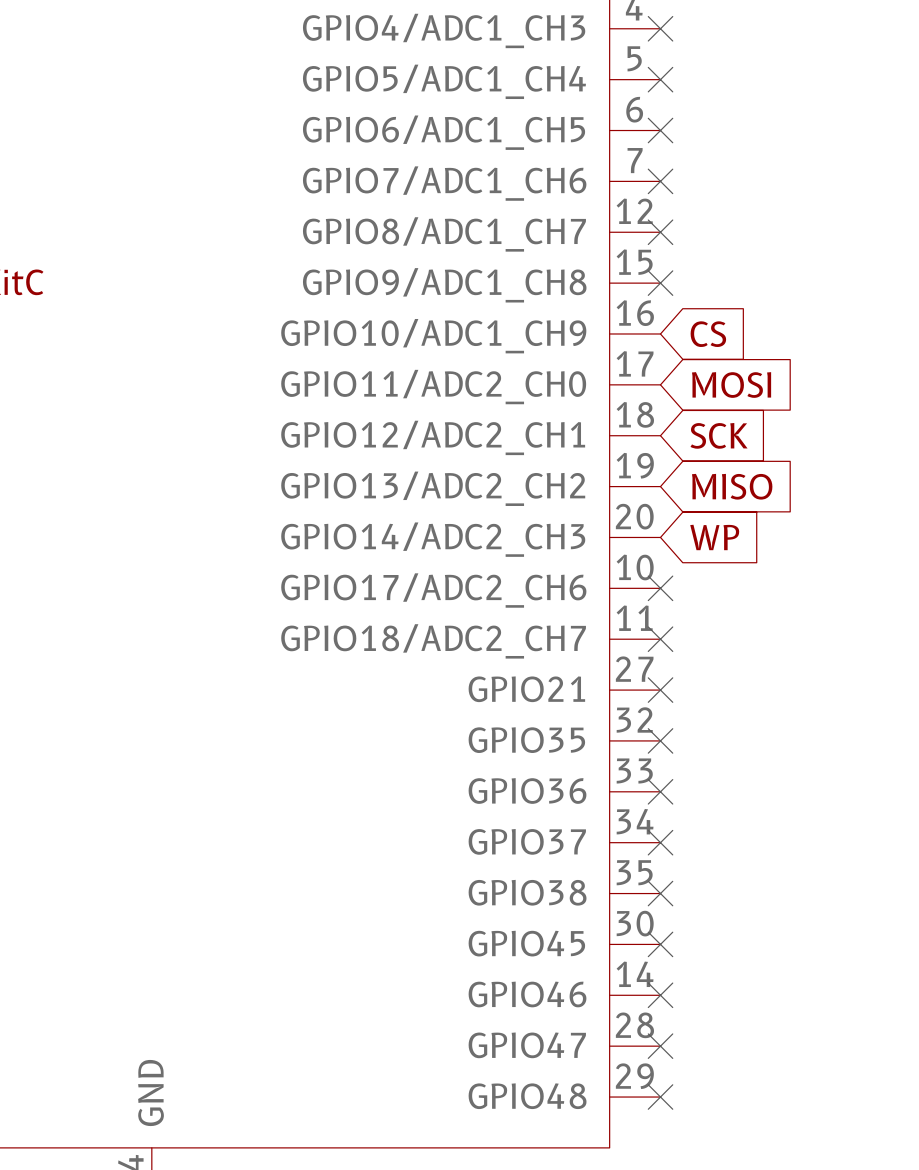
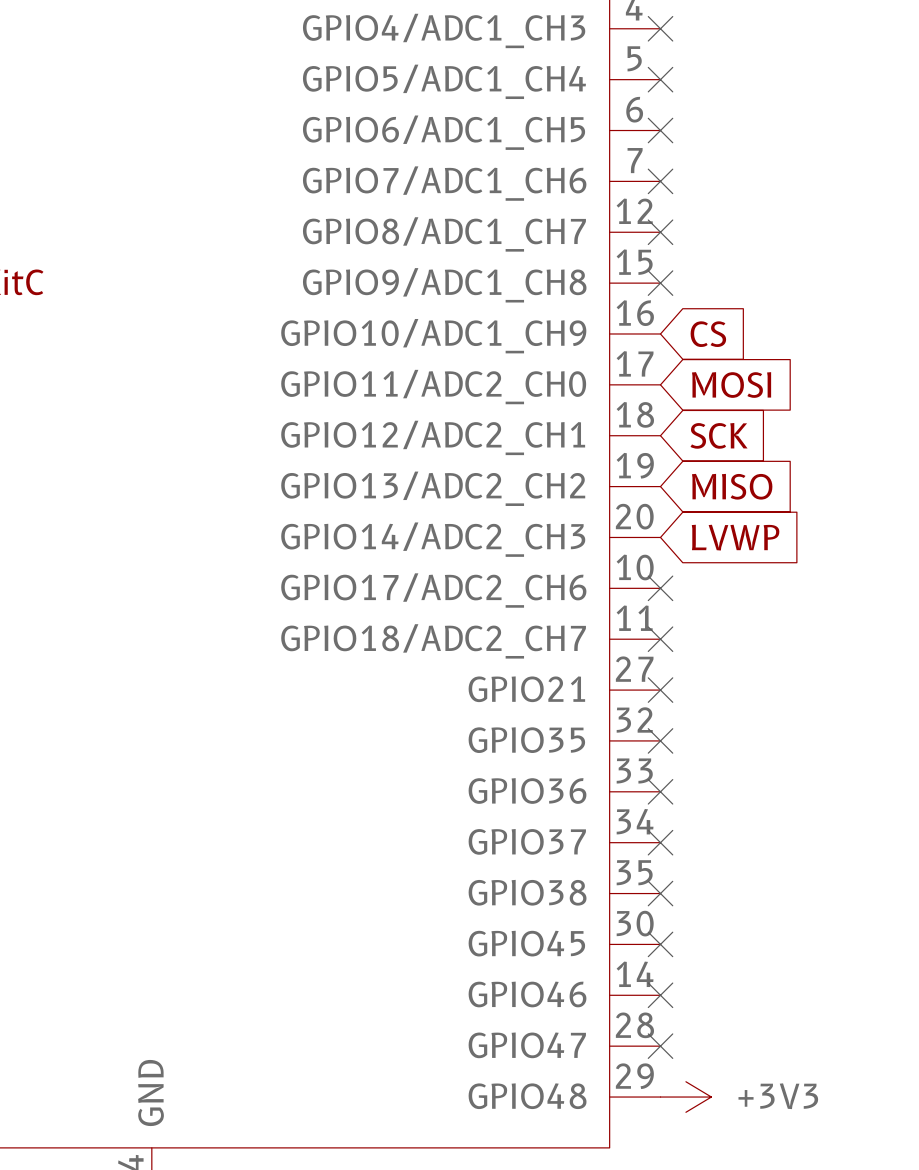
global label: WP (714, 537) -> LVWP (735, 537)
no-connect mark: (660, 1097) -> none
power symbol: none -> +3V3 (685, 1097)

